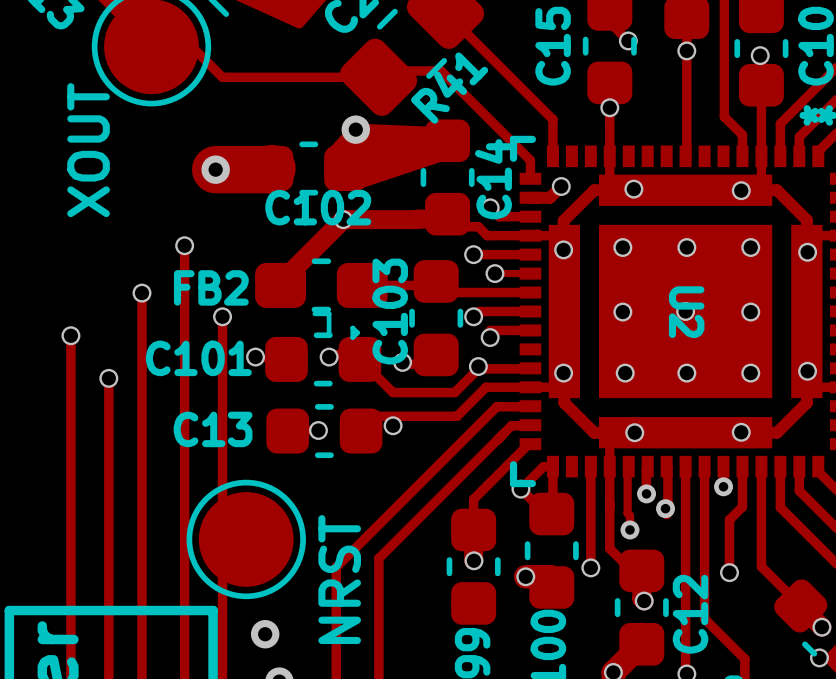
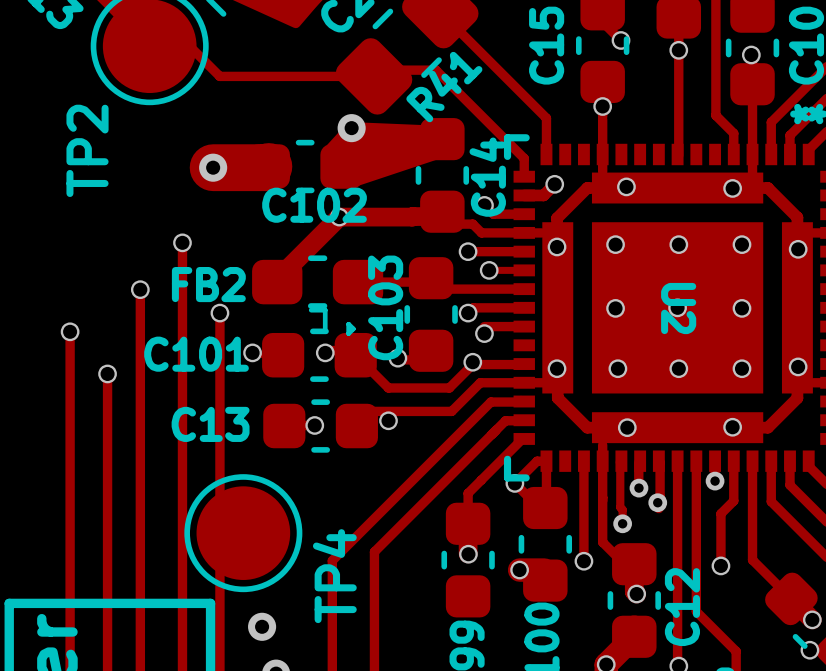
XOUT name: XOUT (88, 150) -> TP2 (87, 150)
NRST name: NRST (339, 579) -> TP4 (334, 576)

